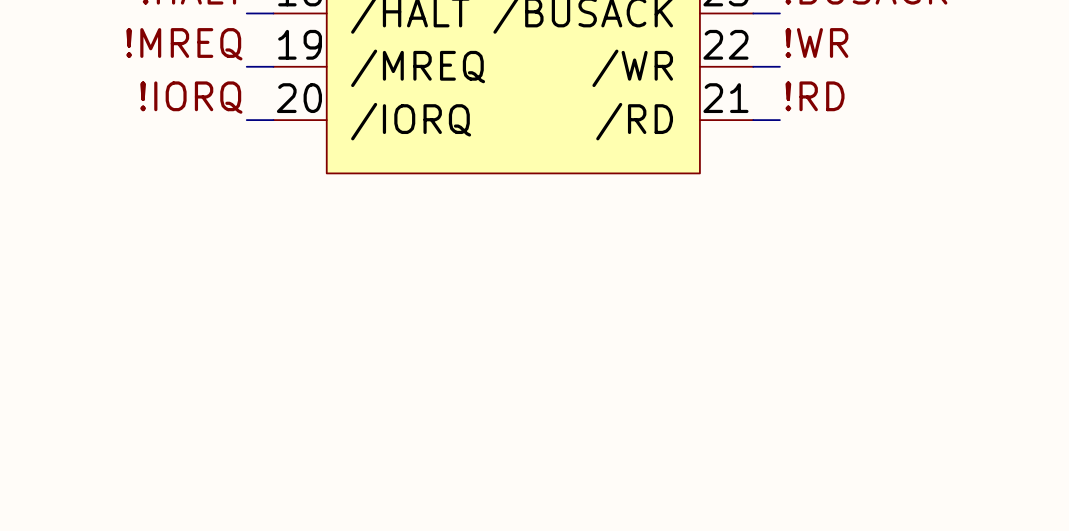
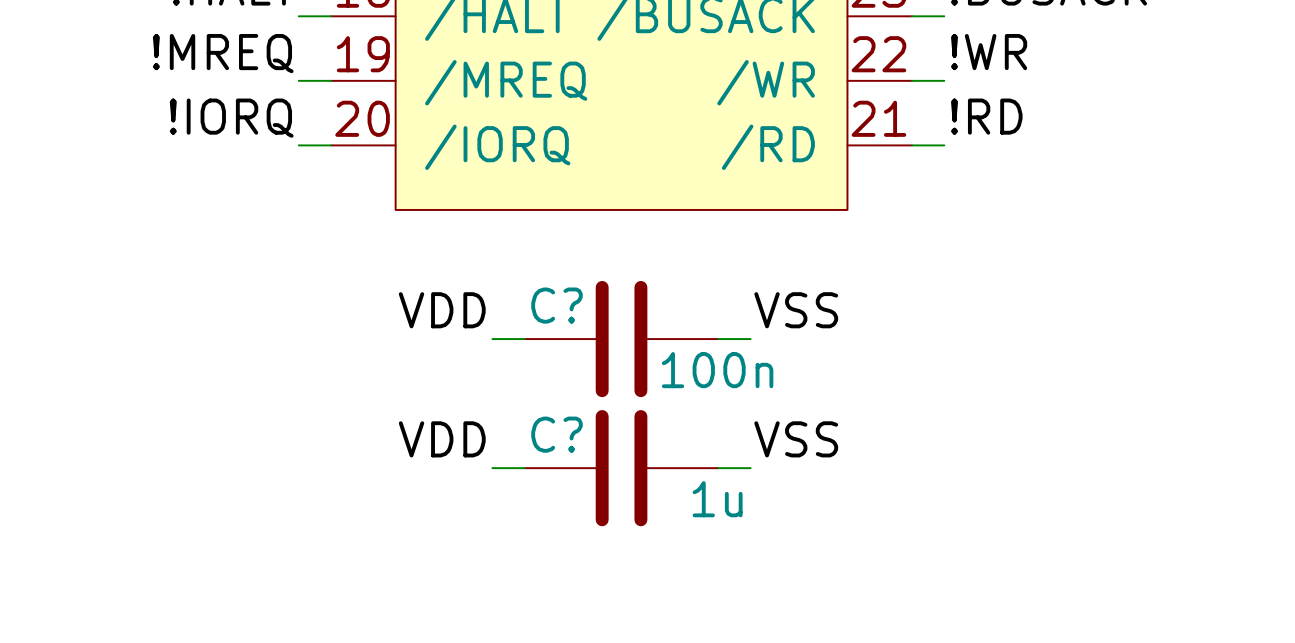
label: none -> VDD (442, 310)
label: none -> VSS (796, 310)
wire: none -> (492, 339) (524, 339)
C?: none -> 100n (621, 339)
wire: none -> (718, 339) (750, 339)
label: none -> VDD (442, 439)
label: none -> VSS (796, 439)
wire: none -> (492, 468) (524, 468)
C?: none -> 1u (621, 468)
wire: none -> (718, 468) (750, 468)

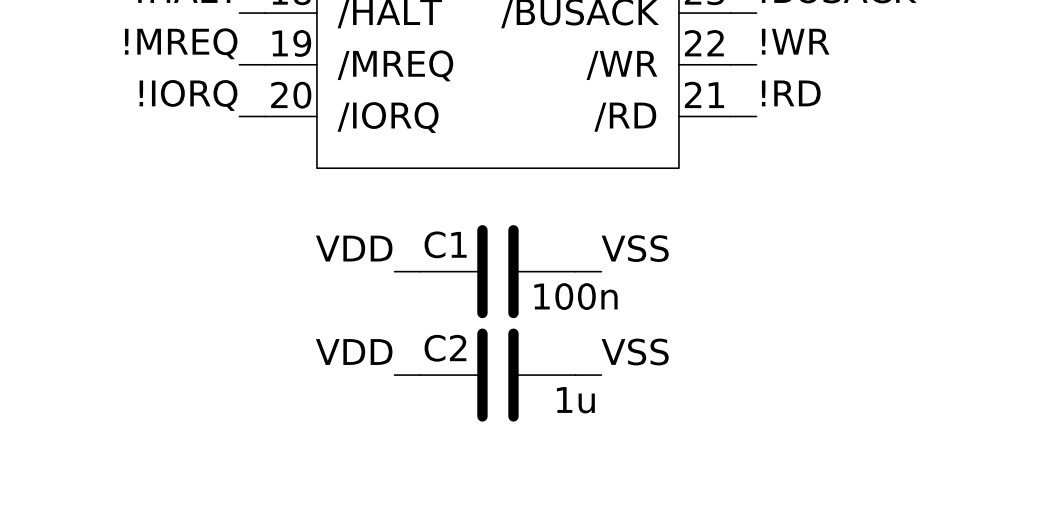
C? name: C? (556, 305) -> C1 (445, 244)
C? name: C? (556, 434) -> C2 (445, 348)

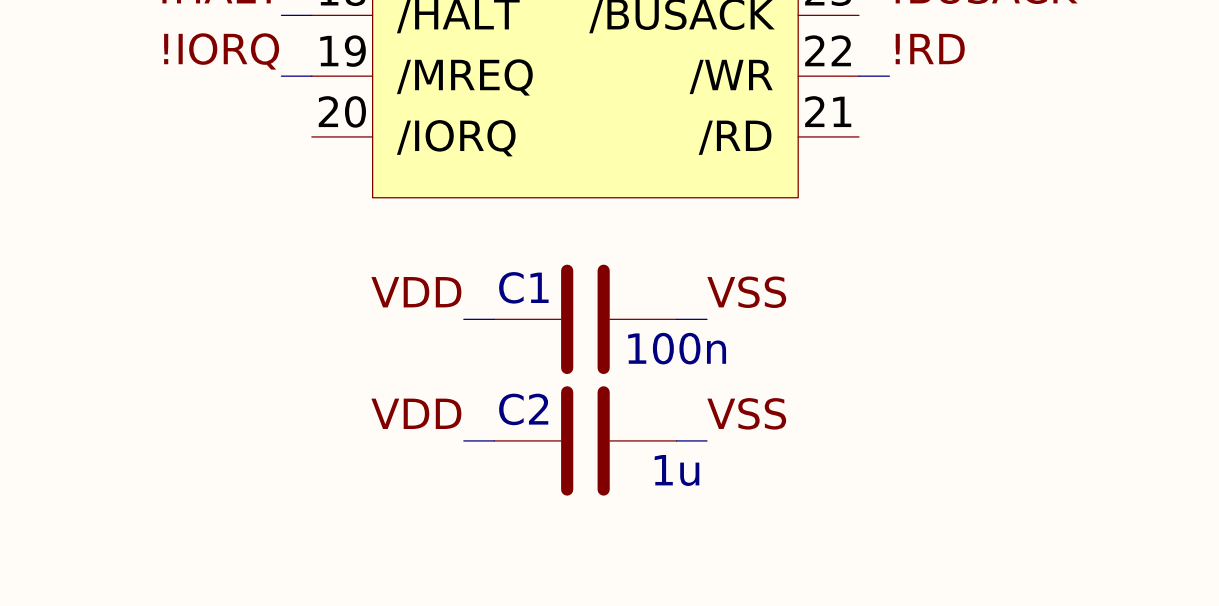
wire: (730, 13) (756, 13) -> none
label: !WR (795, 41) -> !RD (930, 49)
label: !MREQ (181, 43) -> !IORQ (221, 51)
label: !RD (791, 93) -> none
label: !IORQ (188, 95) -> none
wire: (239, 116) (265, 116) -> none
wire: (730, 116) (756, 116) -> none

